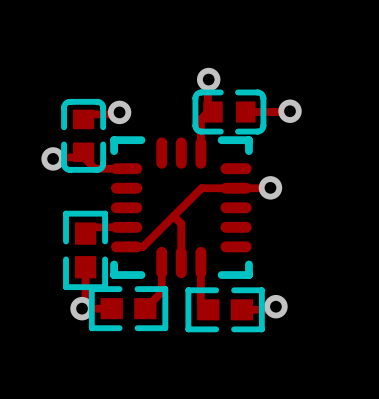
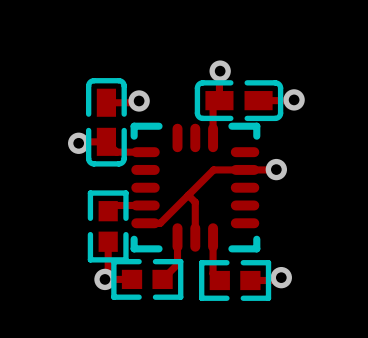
part footprint: [192, 89, 267, 135] -> [194, 80, 284, 122]
part footprint: [61, 98, 107, 173] -> [85, 78, 127, 167]

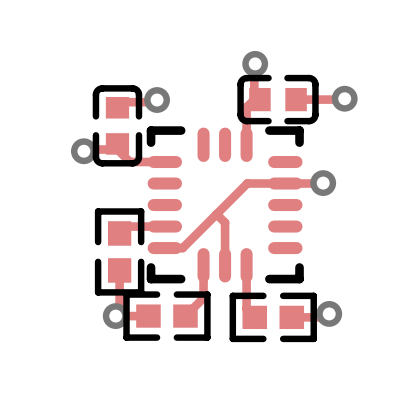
part footprint: [85, 78, 127, 167] -> [92, 85, 143, 167]
part footprint: [194, 80, 284, 122] -> [237, 74, 319, 125]

